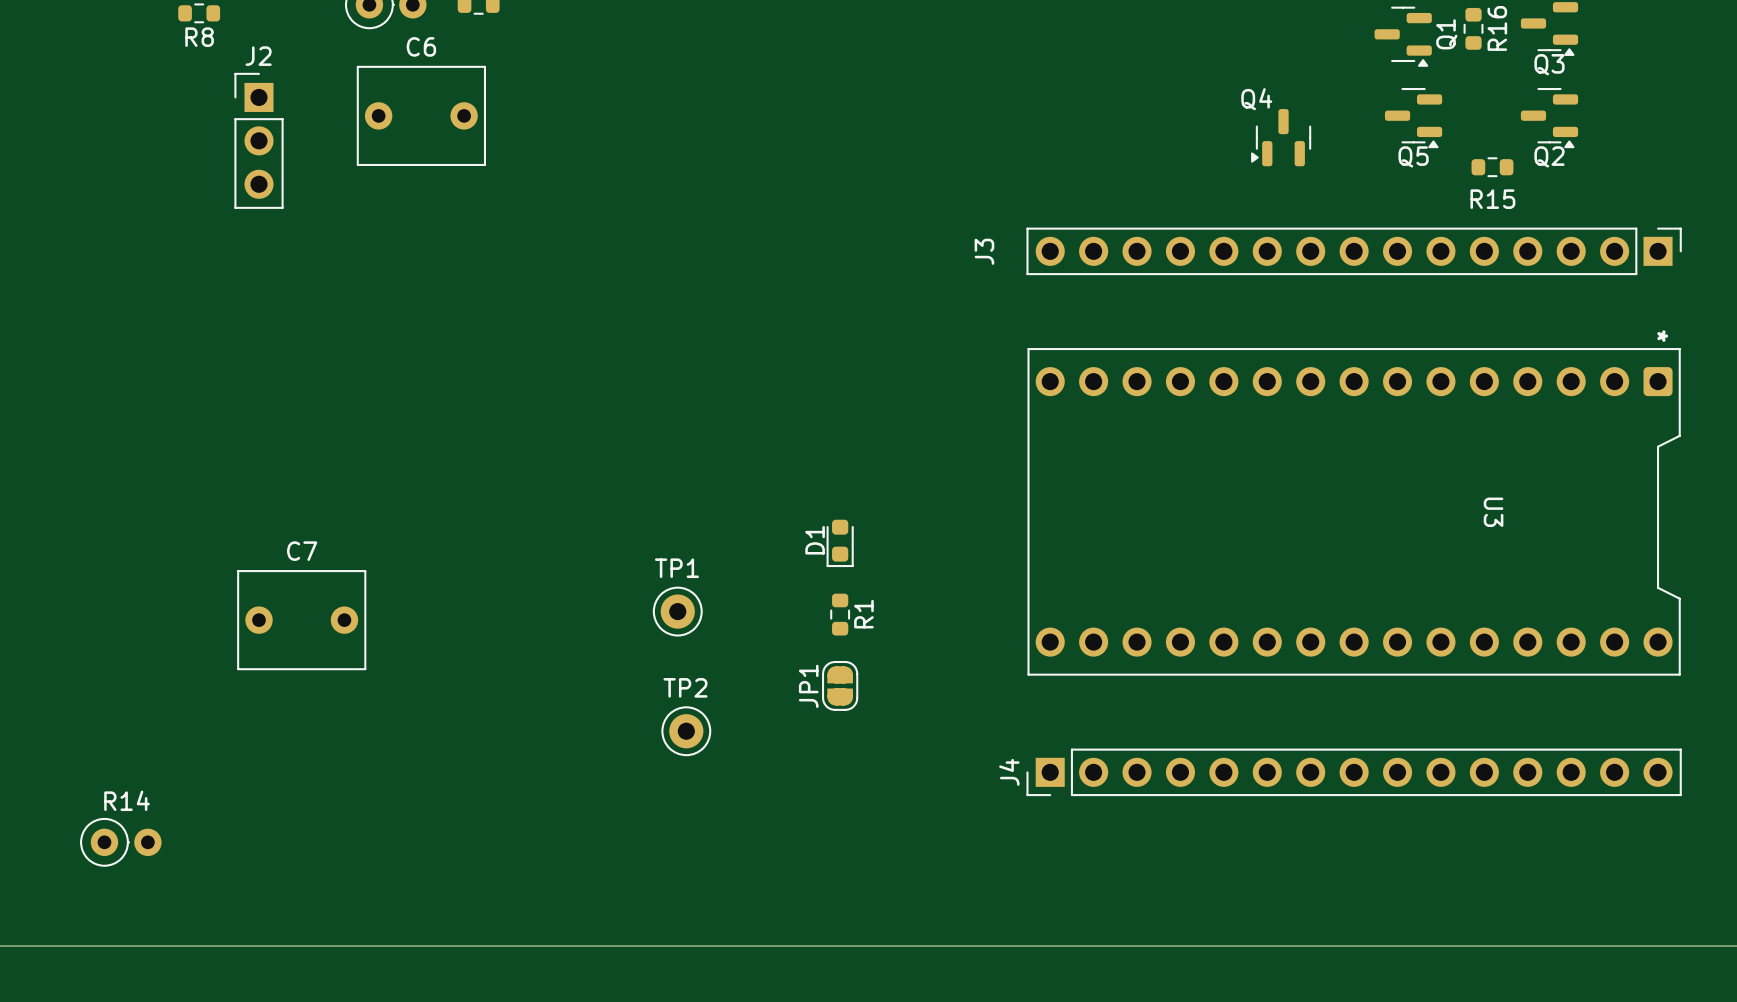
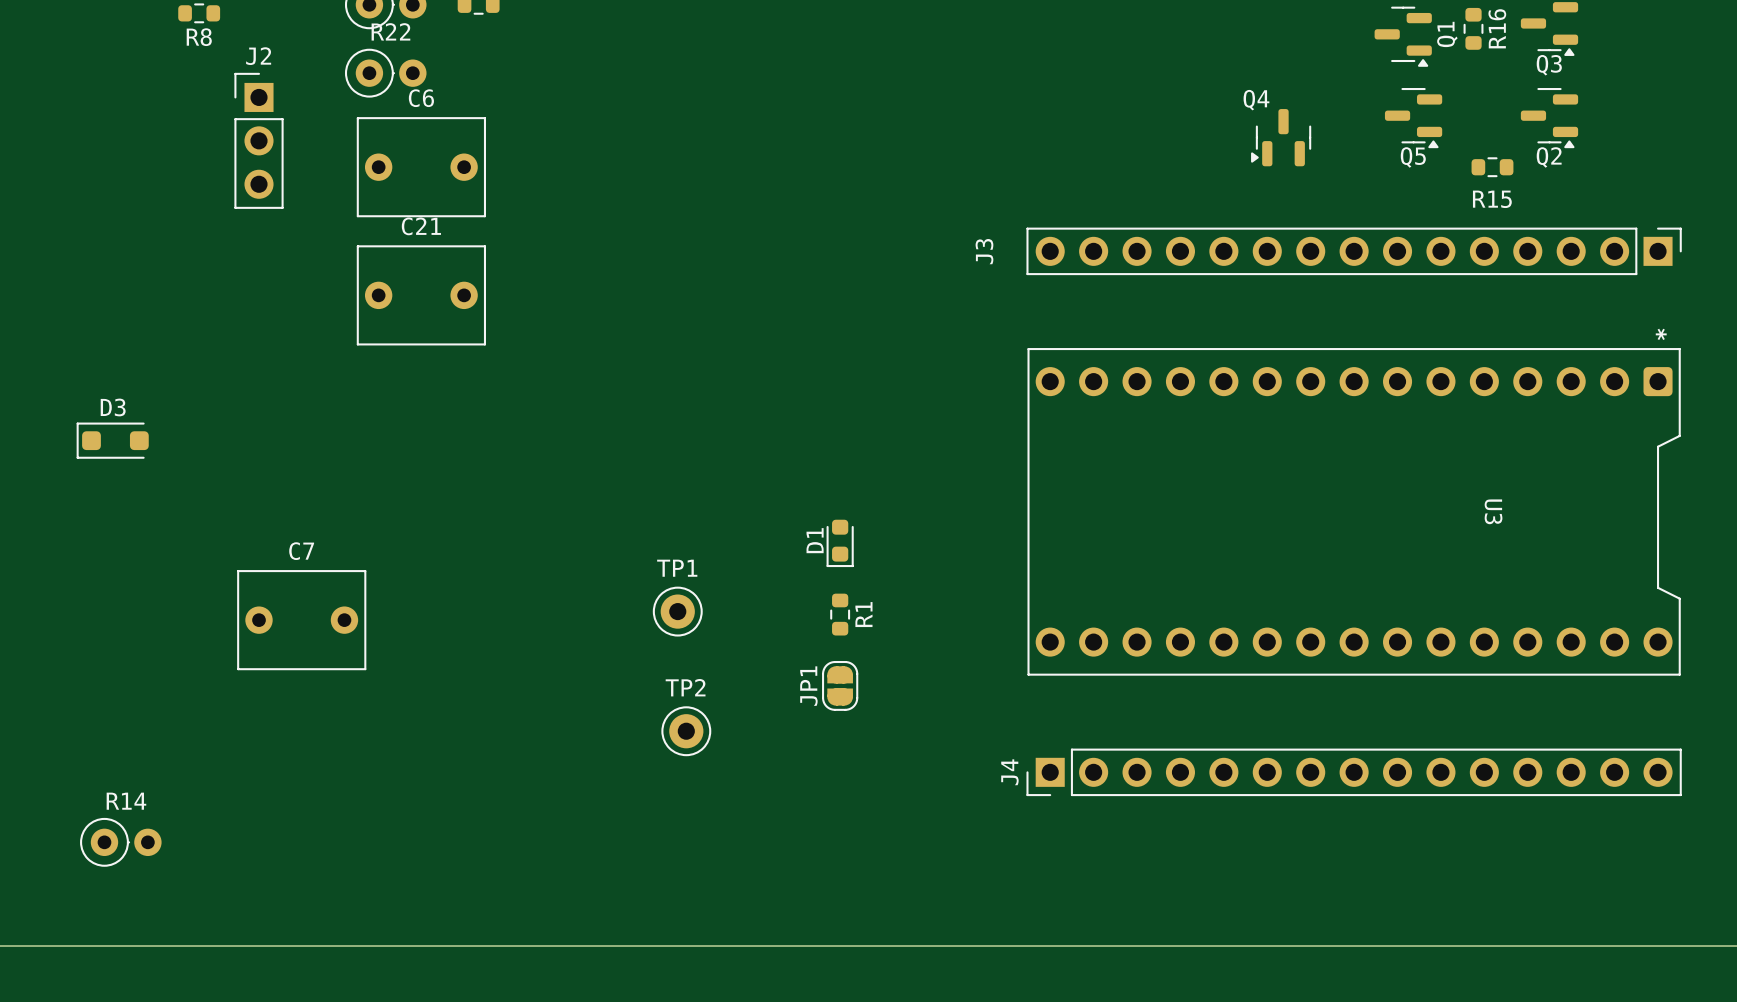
R22: none -> (385, 73)
C6 position: (421, 115) -> (421, 167)
C21: none -> (421, 295)
D3: none -> (112, 440)

